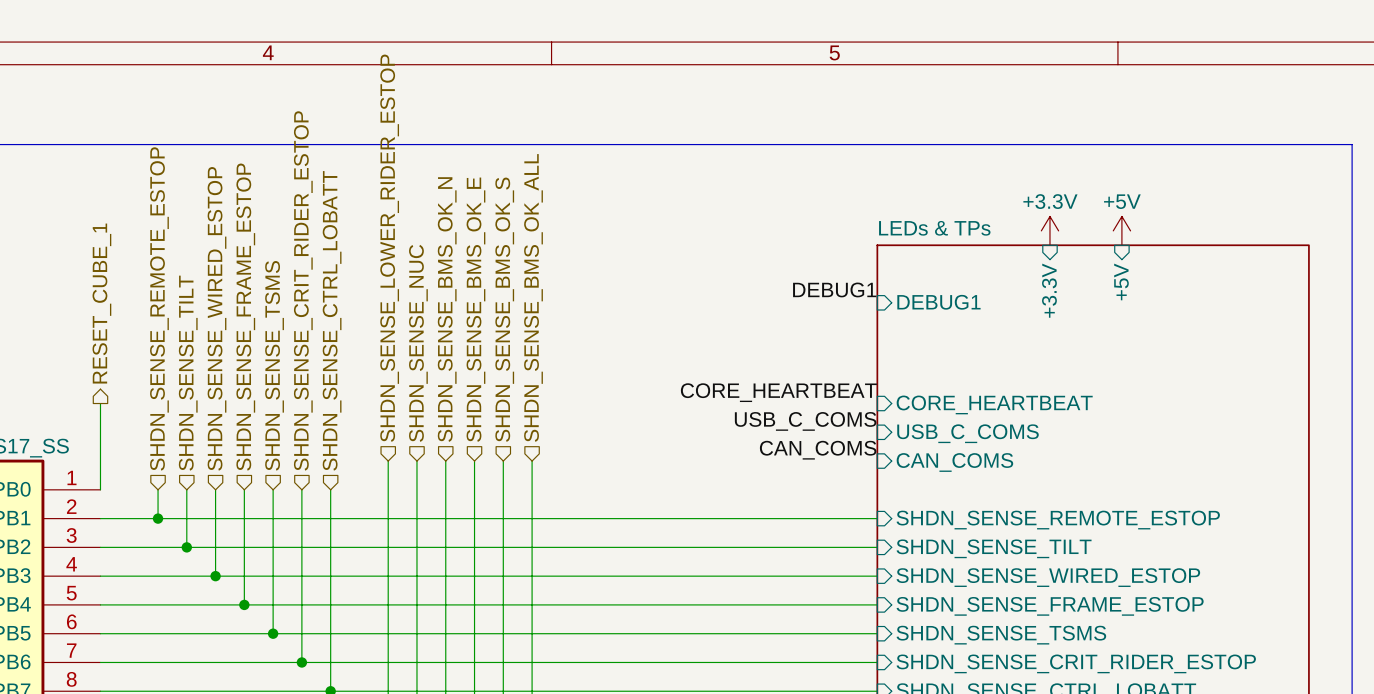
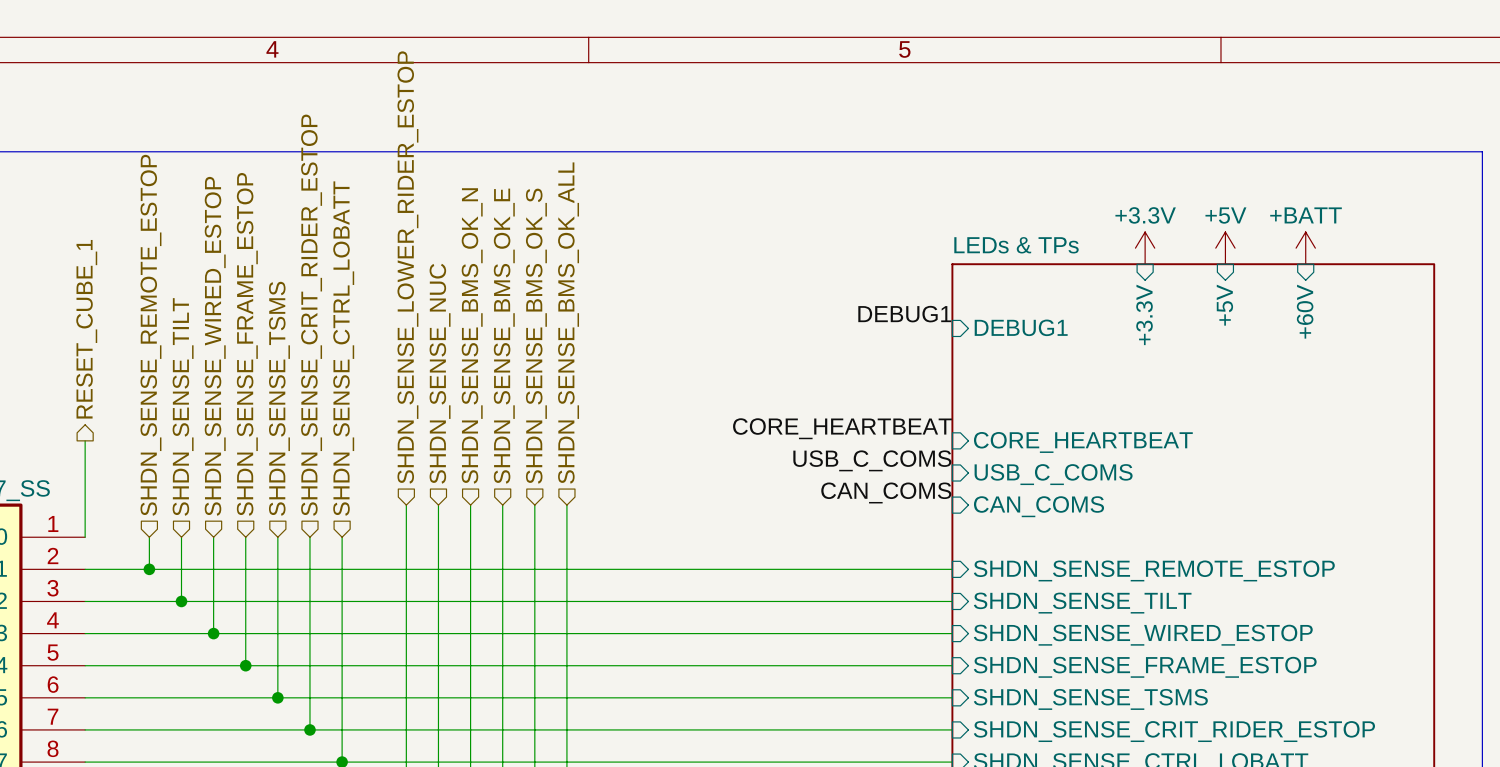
power symbol: none -> +BATT (1305, 248)
sheet pin: none -> +60V (1305, 311)

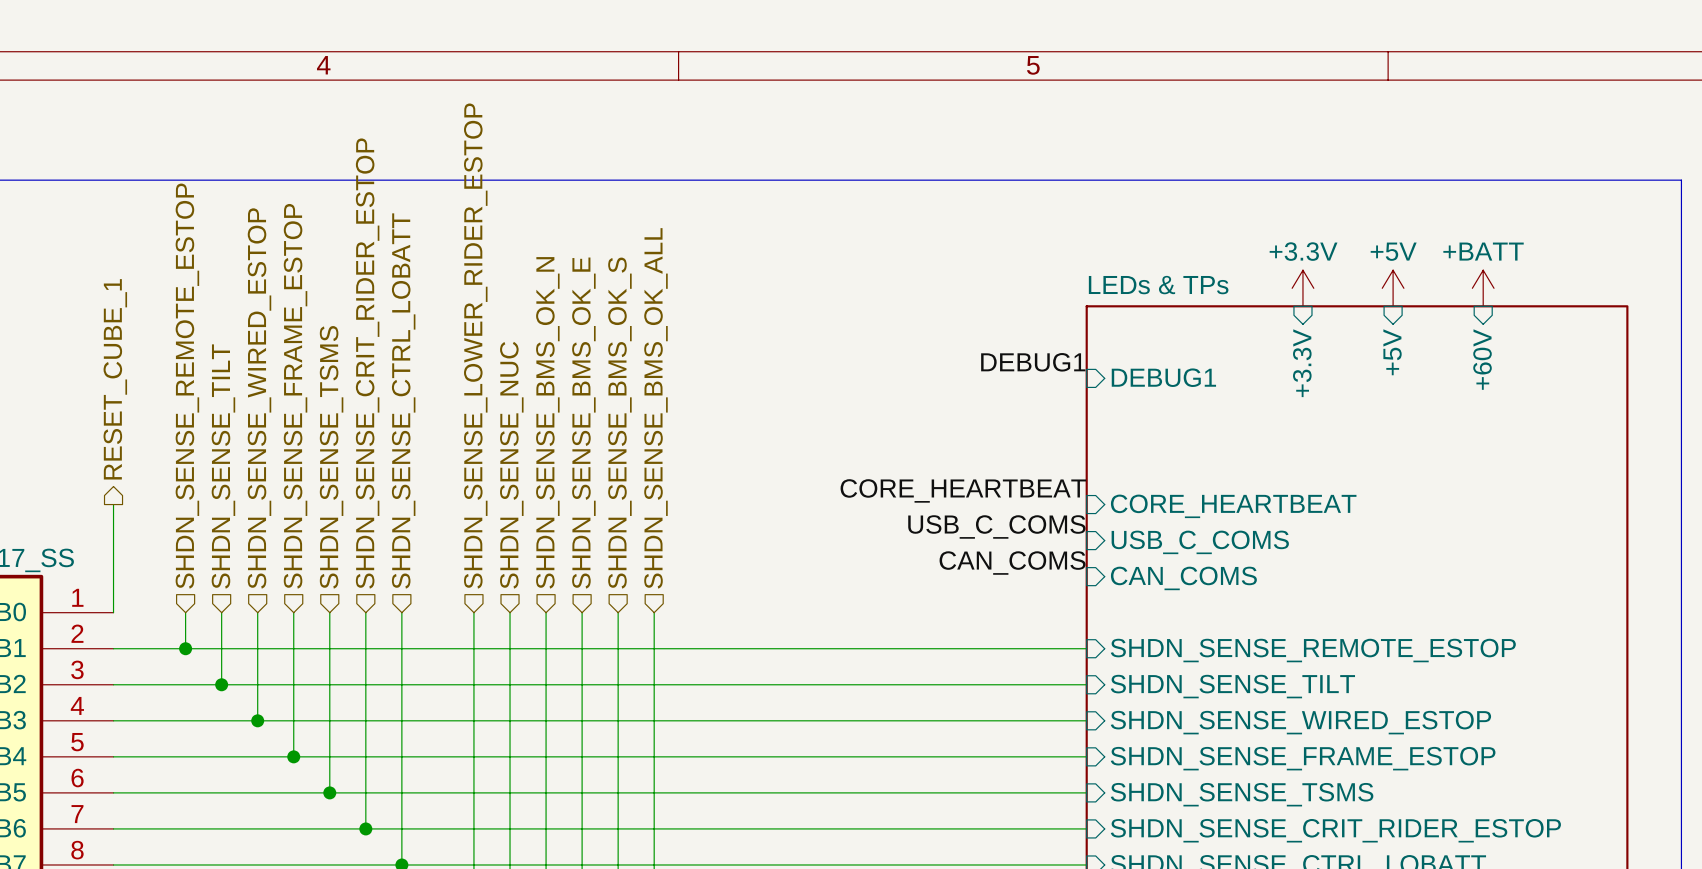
hierarchical label position: SHDN_SENSE_LOWER_RIDER_ESTOP (407, 267) -> SHDN_SENSE_LOWER_RIDER_ESTOP (475, 346)
hierarchical label position: SHDN_SENSE_BMS_OK_ALL (568, 323) -> SHDN_SENSE_BMS_OK_ALL (655, 408)
hierarchical label position: SHDN_SENSE_BMS_OK_N (472, 335) -> SHDN_SENSE_BMS_OK_N (547, 422)
hierarchical label position: SHDN_SENSE_BMS_OK_E (504, 336) -> SHDN_SENSE_BMS_OK_E (583, 423)
hierarchical label position: SHDN_SENSE_BMS_OK_S (536, 336) -> SHDN_SENSE_BMS_OK_S (619, 423)
hierarchical label position: SHDN_SENSE_NUC (440, 373) -> SHDN_SENSE_NUC (511, 465)
wire: (406, 505) (406, 537) -> none
wire: (438, 505) (438, 537) -> none
wire: (470, 505) (470, 537) -> none
wire: (502, 505) (502, 537) -> none
wire: (534, 505) (534, 537) -> none
wire: (566, 505) (566, 537) -> none

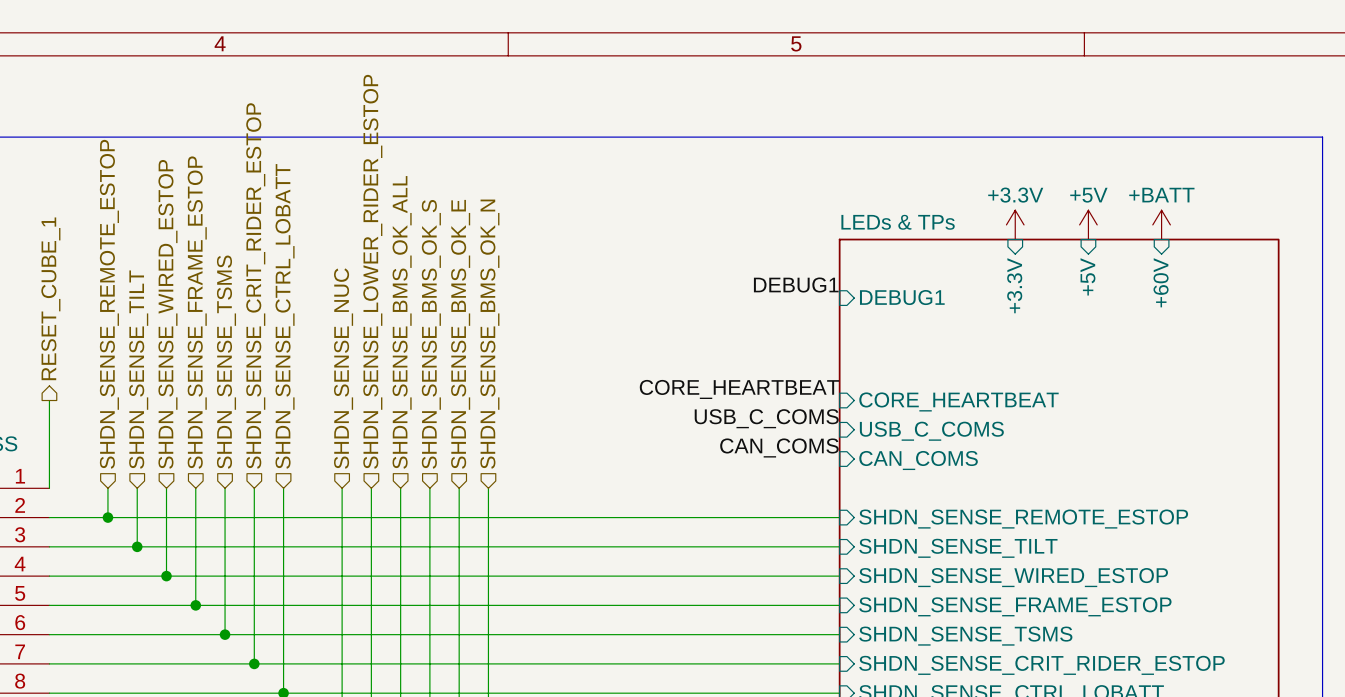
hierarchical label: SHDN_SENSE_LOWER_RIDER_ESTOP (475, 346) -> SHDN_SENSE_NUC (343, 368)
hierarchical label: SHDN_SENSE_BMS_OK_ALL (655, 408) -> SHDN_SENSE_BMS_OK_N (489, 334)
hierarchical label: SHDN_SENSE_BMS_OK_N (547, 422) -> SHDN_SENSE_BMS_OK_ALL (402, 322)
hierarchical label: SHDN_SENSE_BMS_OK_E (583, 423) -> SHDN_SENSE_BMS_OK_S (431, 334)
hierarchical label: SHDN_SENSE_BMS_OK_S (619, 423) -> SHDN_SENSE_BMS_OK_E (460, 334)
hierarchical label: SHDN_SENSE_NUC (511, 465) -> SHDN_SENSE_LOWER_RIDER_ESTOP (372, 271)

